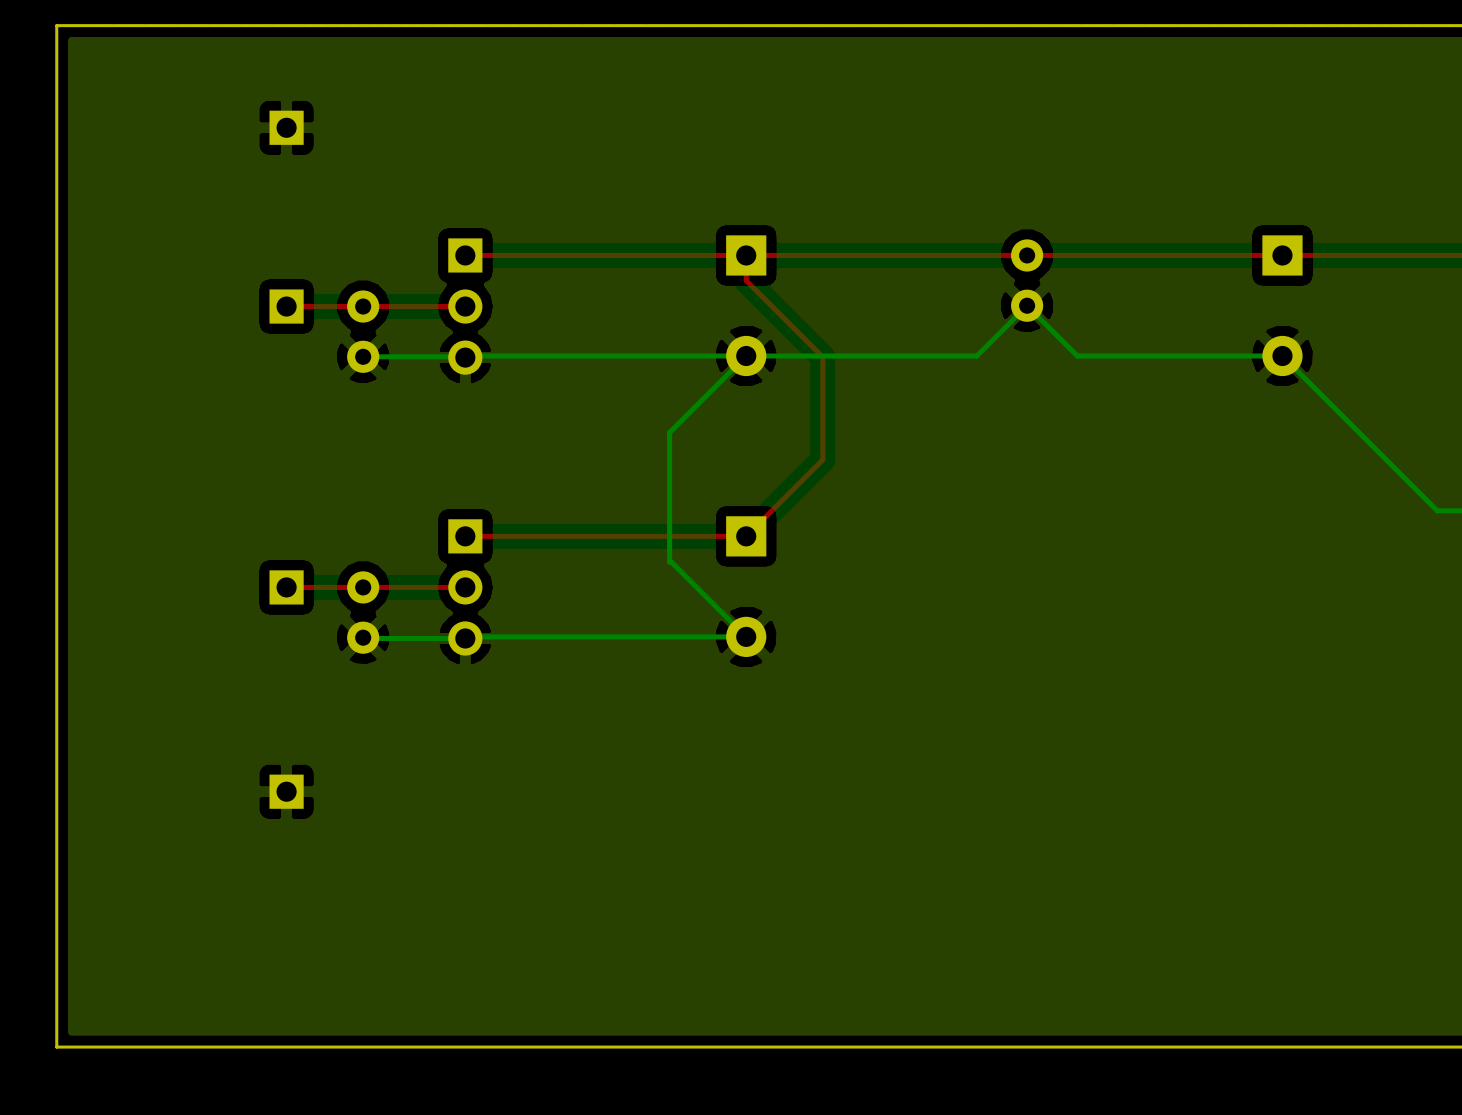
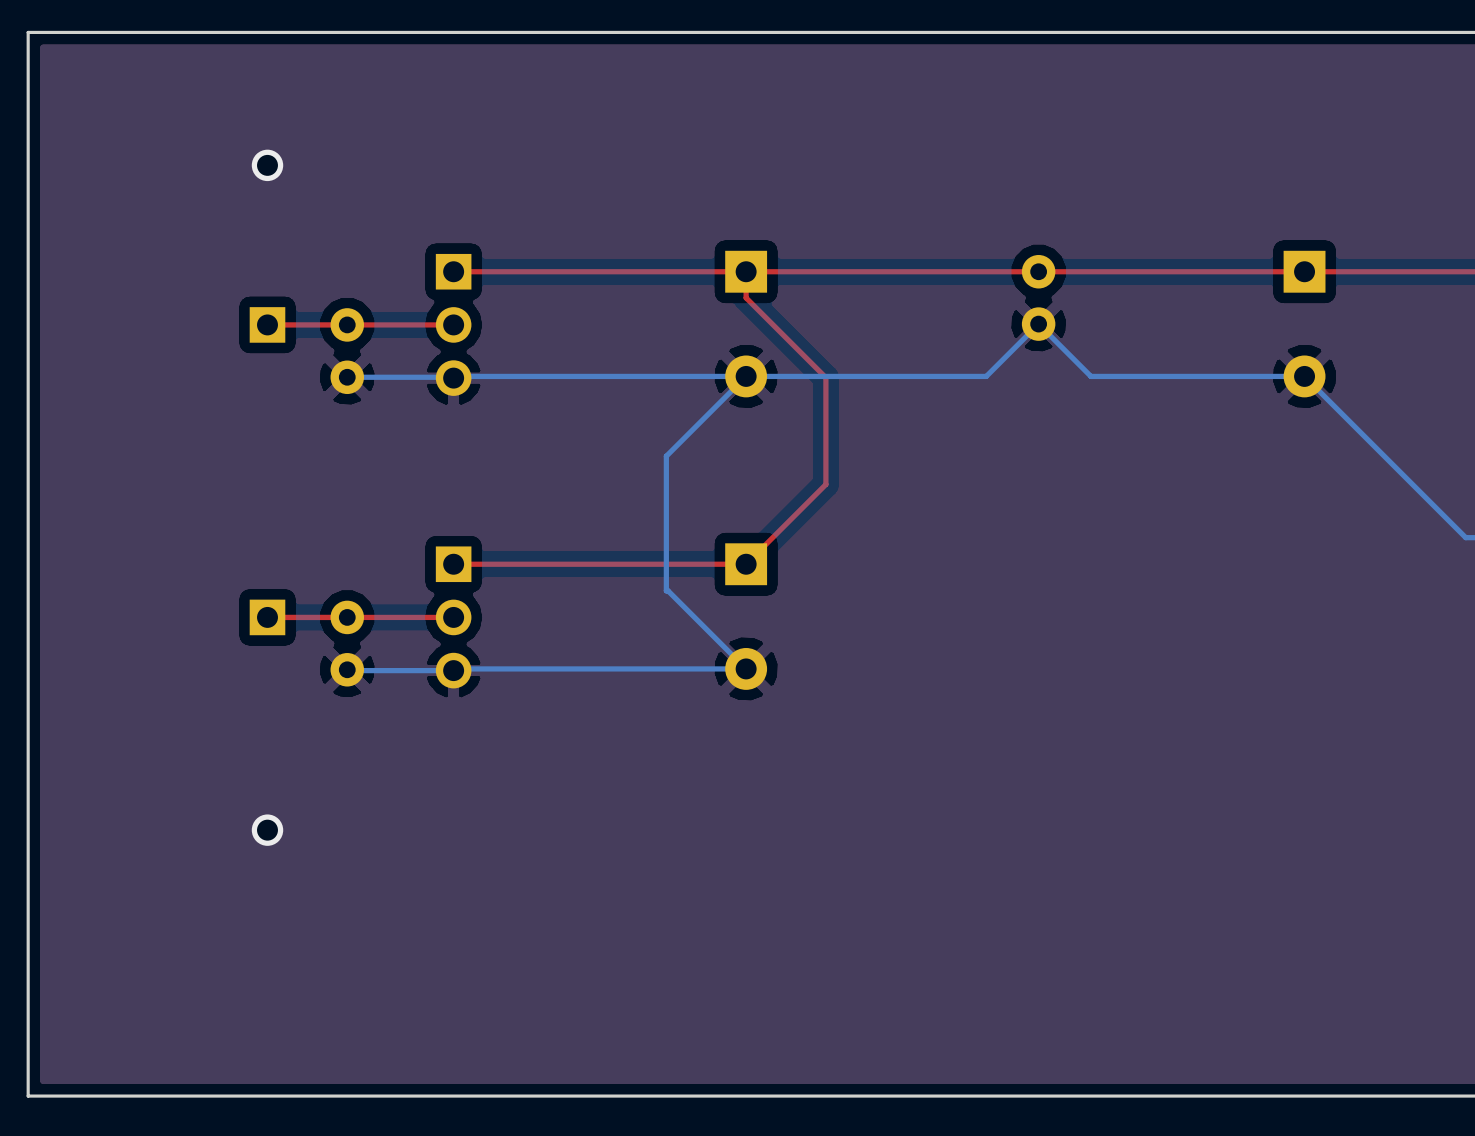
part: (286, 127) -> none
via: none -> (267, 165)
part: (286, 791) -> none
via: none -> (267, 830)

